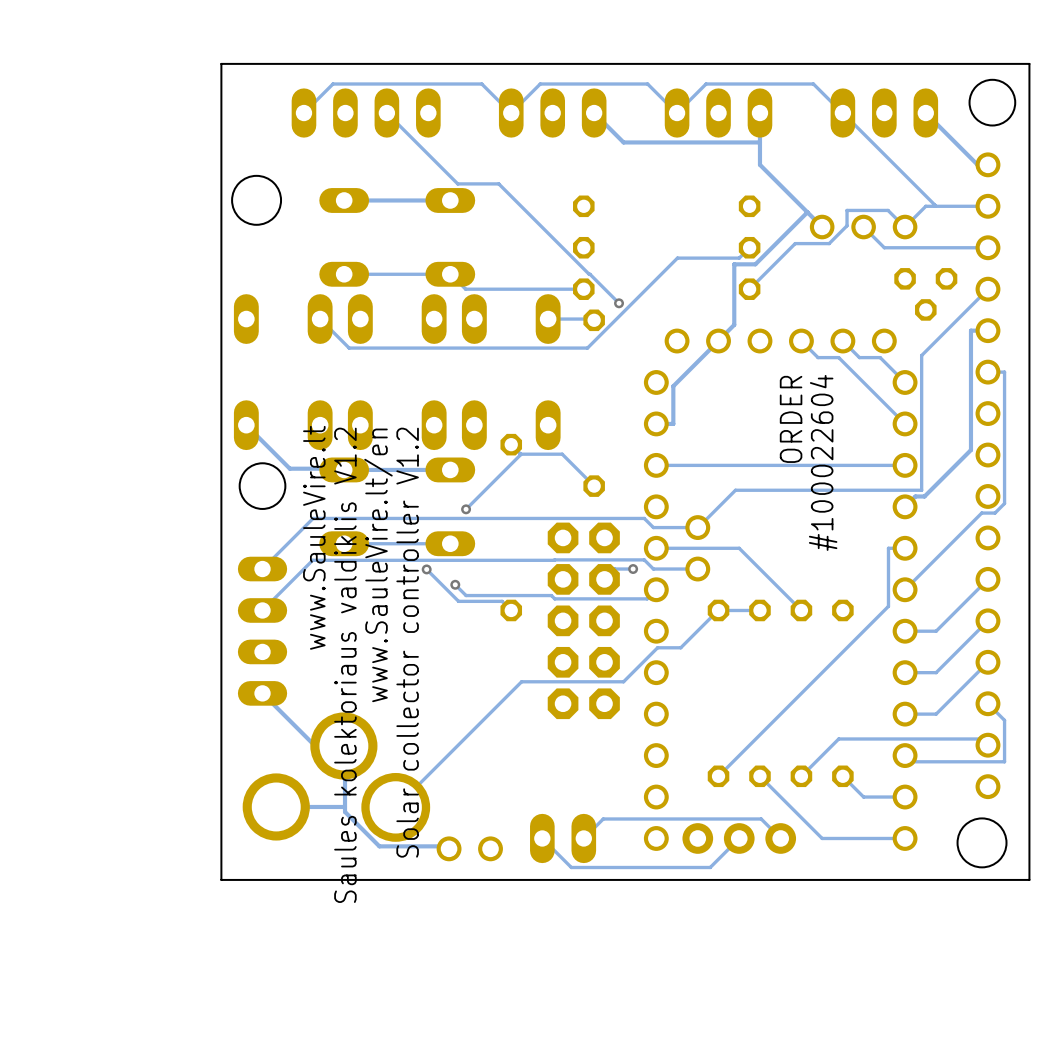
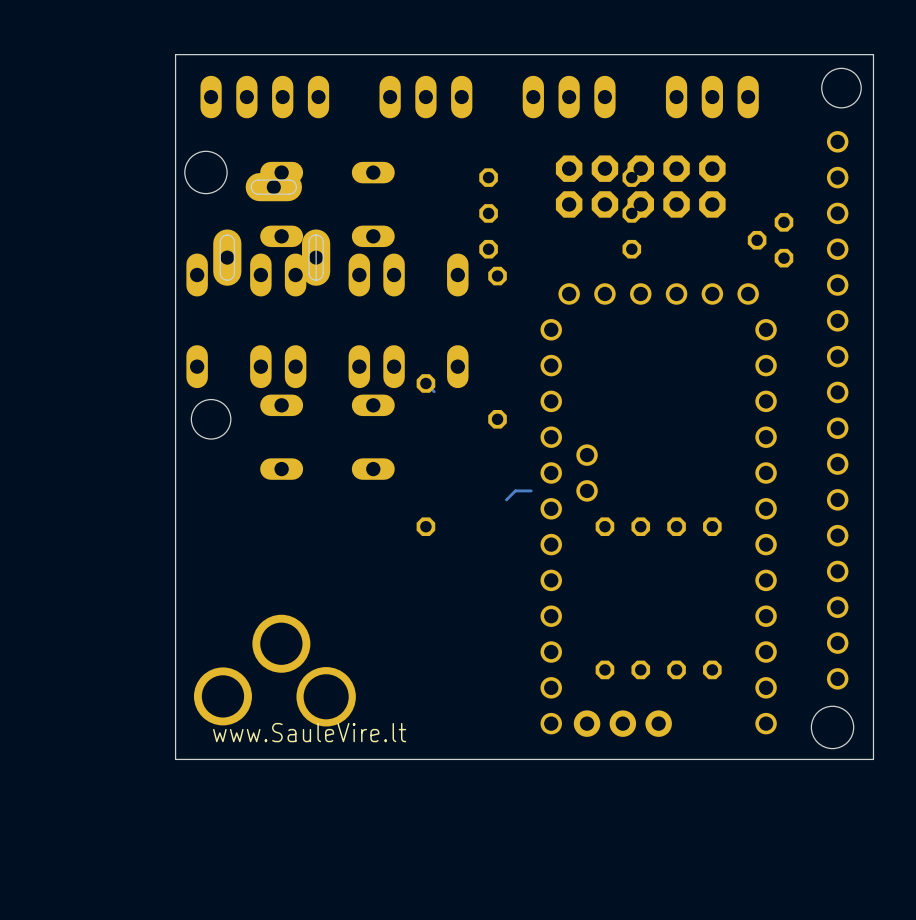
track: (303, 113) (332, 84) (481, 84) (511, 113) (540, 84) (647, 84) (677, 113) (706, 84) (813, 84) (934, 206) -> none
part position: (366, 113) -> (264, 97)
track: (386, 113) (457, 183) (498, 183) (619, 303) -> none
part position: (552, 113) -> (425, 97)
track: (594, 113) (623, 142) (759, 142) -> none
part position: (718, 113) -> (569, 97)
track: (759, 113) (759, 164) (822, 227) -> none
part position: (884, 113) -> (712, 97)
track: (925, 113) (977, 164) (987, 164) -> none
track: (450, 200) (344, 200) -> none
track: (987, 206) (925, 206) (905, 227) (888, 210) (847, 210) (847, 225) (829, 243) (795, 243) (749, 289) -> none
track: (807, 212) (755, 264) (734, 264) (734, 324) (673, 386) (673, 423) (656, 423) -> none
part: none -> (640, 186)
track: (863, 227) (884, 247) (987, 247) -> none
part: (863, 227) -> none
track: (749, 247) (739, 258) (677, 258) (587, 348) (349, 348) (320, 319) -> none
part: none -> (271, 229)
track: (344, 274) (450, 274) (465, 289) (583, 289) -> none
track: (987, 289) (921, 355) (921, 490) (735, 490) (697, 527) (653, 527) (644, 518) (313, 518) (262, 569) -> none
part rotation: 0° (925, 294) -> 90° clockwise (770, 240)
via: (619, 303) -> none
track: (548, 319) (594, 320) -> none
track: (987, 330) (970, 330) (970, 450) (924, 496) (915, 496) (905, 506) -> none
track: (801, 341) (818, 357) (838, 357) (905, 423) -> none
track: (842, 341) (859, 357) (880, 357) (905, 382) -> none
track: (987, 372) (1004, 372) (1004, 503) (995, 513) (981, 513) (905, 589) -> none
text: ORDER (791, 419) -> none
track: (246, 425) (289, 468) (450, 469) -> none
text: #100022604 (823, 462) -> none
track: (905, 465) (656, 465) -> none
track: (594, 486) (562, 454) (520, 454) (466, 509) -> none
via: (466, 509) -> none
text: www.SauleVire.lt (314, 537) -> none
track: (450, 543) (344, 543) -> none
track: (656, 548) (739, 548) (801, 610) -> none
track: (905, 548) (888, 548) (888, 606) (718, 776) -> none
text: www.SauleVire.lt/en (378, 565) -> none
track: (426, 569) (458, 601) (502, 601) (511, 610) -> none
via: (426, 569) -> none
via: (633, 569) -> none
track: (697, 569) (653, 569) (644, 559) (312, 560) (262, 610) -> none
track: (987, 579) (936, 631) (905, 631) -> none
track: (455, 584) (466, 595) (551, 595) (554, 598) (647, 598) (656, 589) -> none
via: (455, 584) -> none
track: (759, 610) (718, 610) (680, 647) (657, 647) (623, 681) (521, 681) (396, 807) -> none
part: (583, 620) -> none
track: (987, 620) (936, 672) (905, 672) -> none
part: (262, 631) -> none
text: Solar collector controller V1.2 (407, 642) -> none
track: (987, 662) (936, 714) (905, 714) -> none
text: Saules kolektoriaus valdiklis V1.2 (345, 665) -> none
track: (262, 693) (314, 745) (343, 745) (345, 811) (379, 846) (446, 846) (449, 848) -> none
track: (987, 703) (1004, 720) (1004, 761) (911, 761) (905, 755) -> none
track: (987, 745) (981, 738) (838, 738) (801, 776) -> none
track: (759, 776) (822, 838) (905, 838) -> none
track: (842, 776) (863, 797) (905, 797) -> none
track: (345, 806) (276, 806) -> none
part: (563, 838) -> none
track: (739, 838) (710, 867) (571, 867) (542, 838) -> none
track: (780, 838) (761, 818) (603, 818) (583, 838) -> none
text: none -> www.SauleVire.lt (309, 732)
part: (469, 848) -> none

